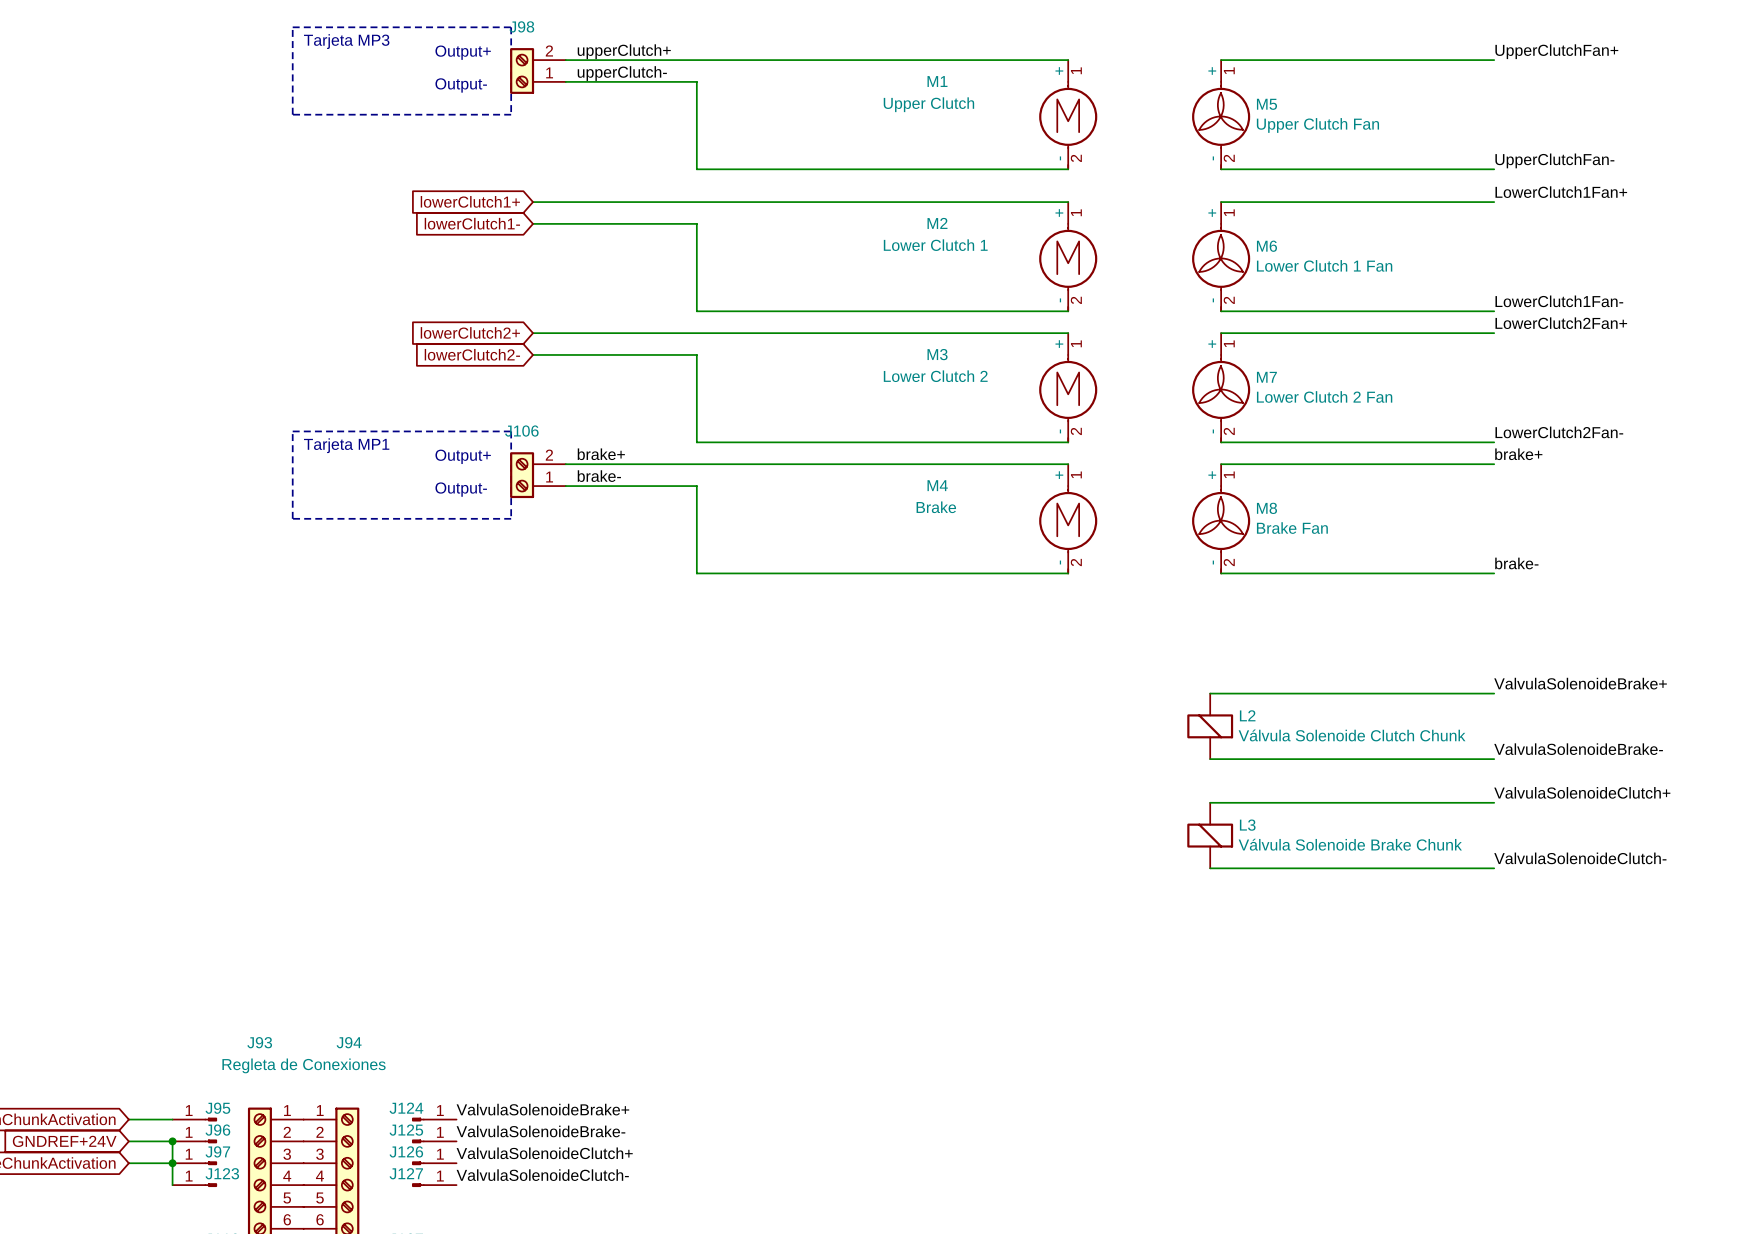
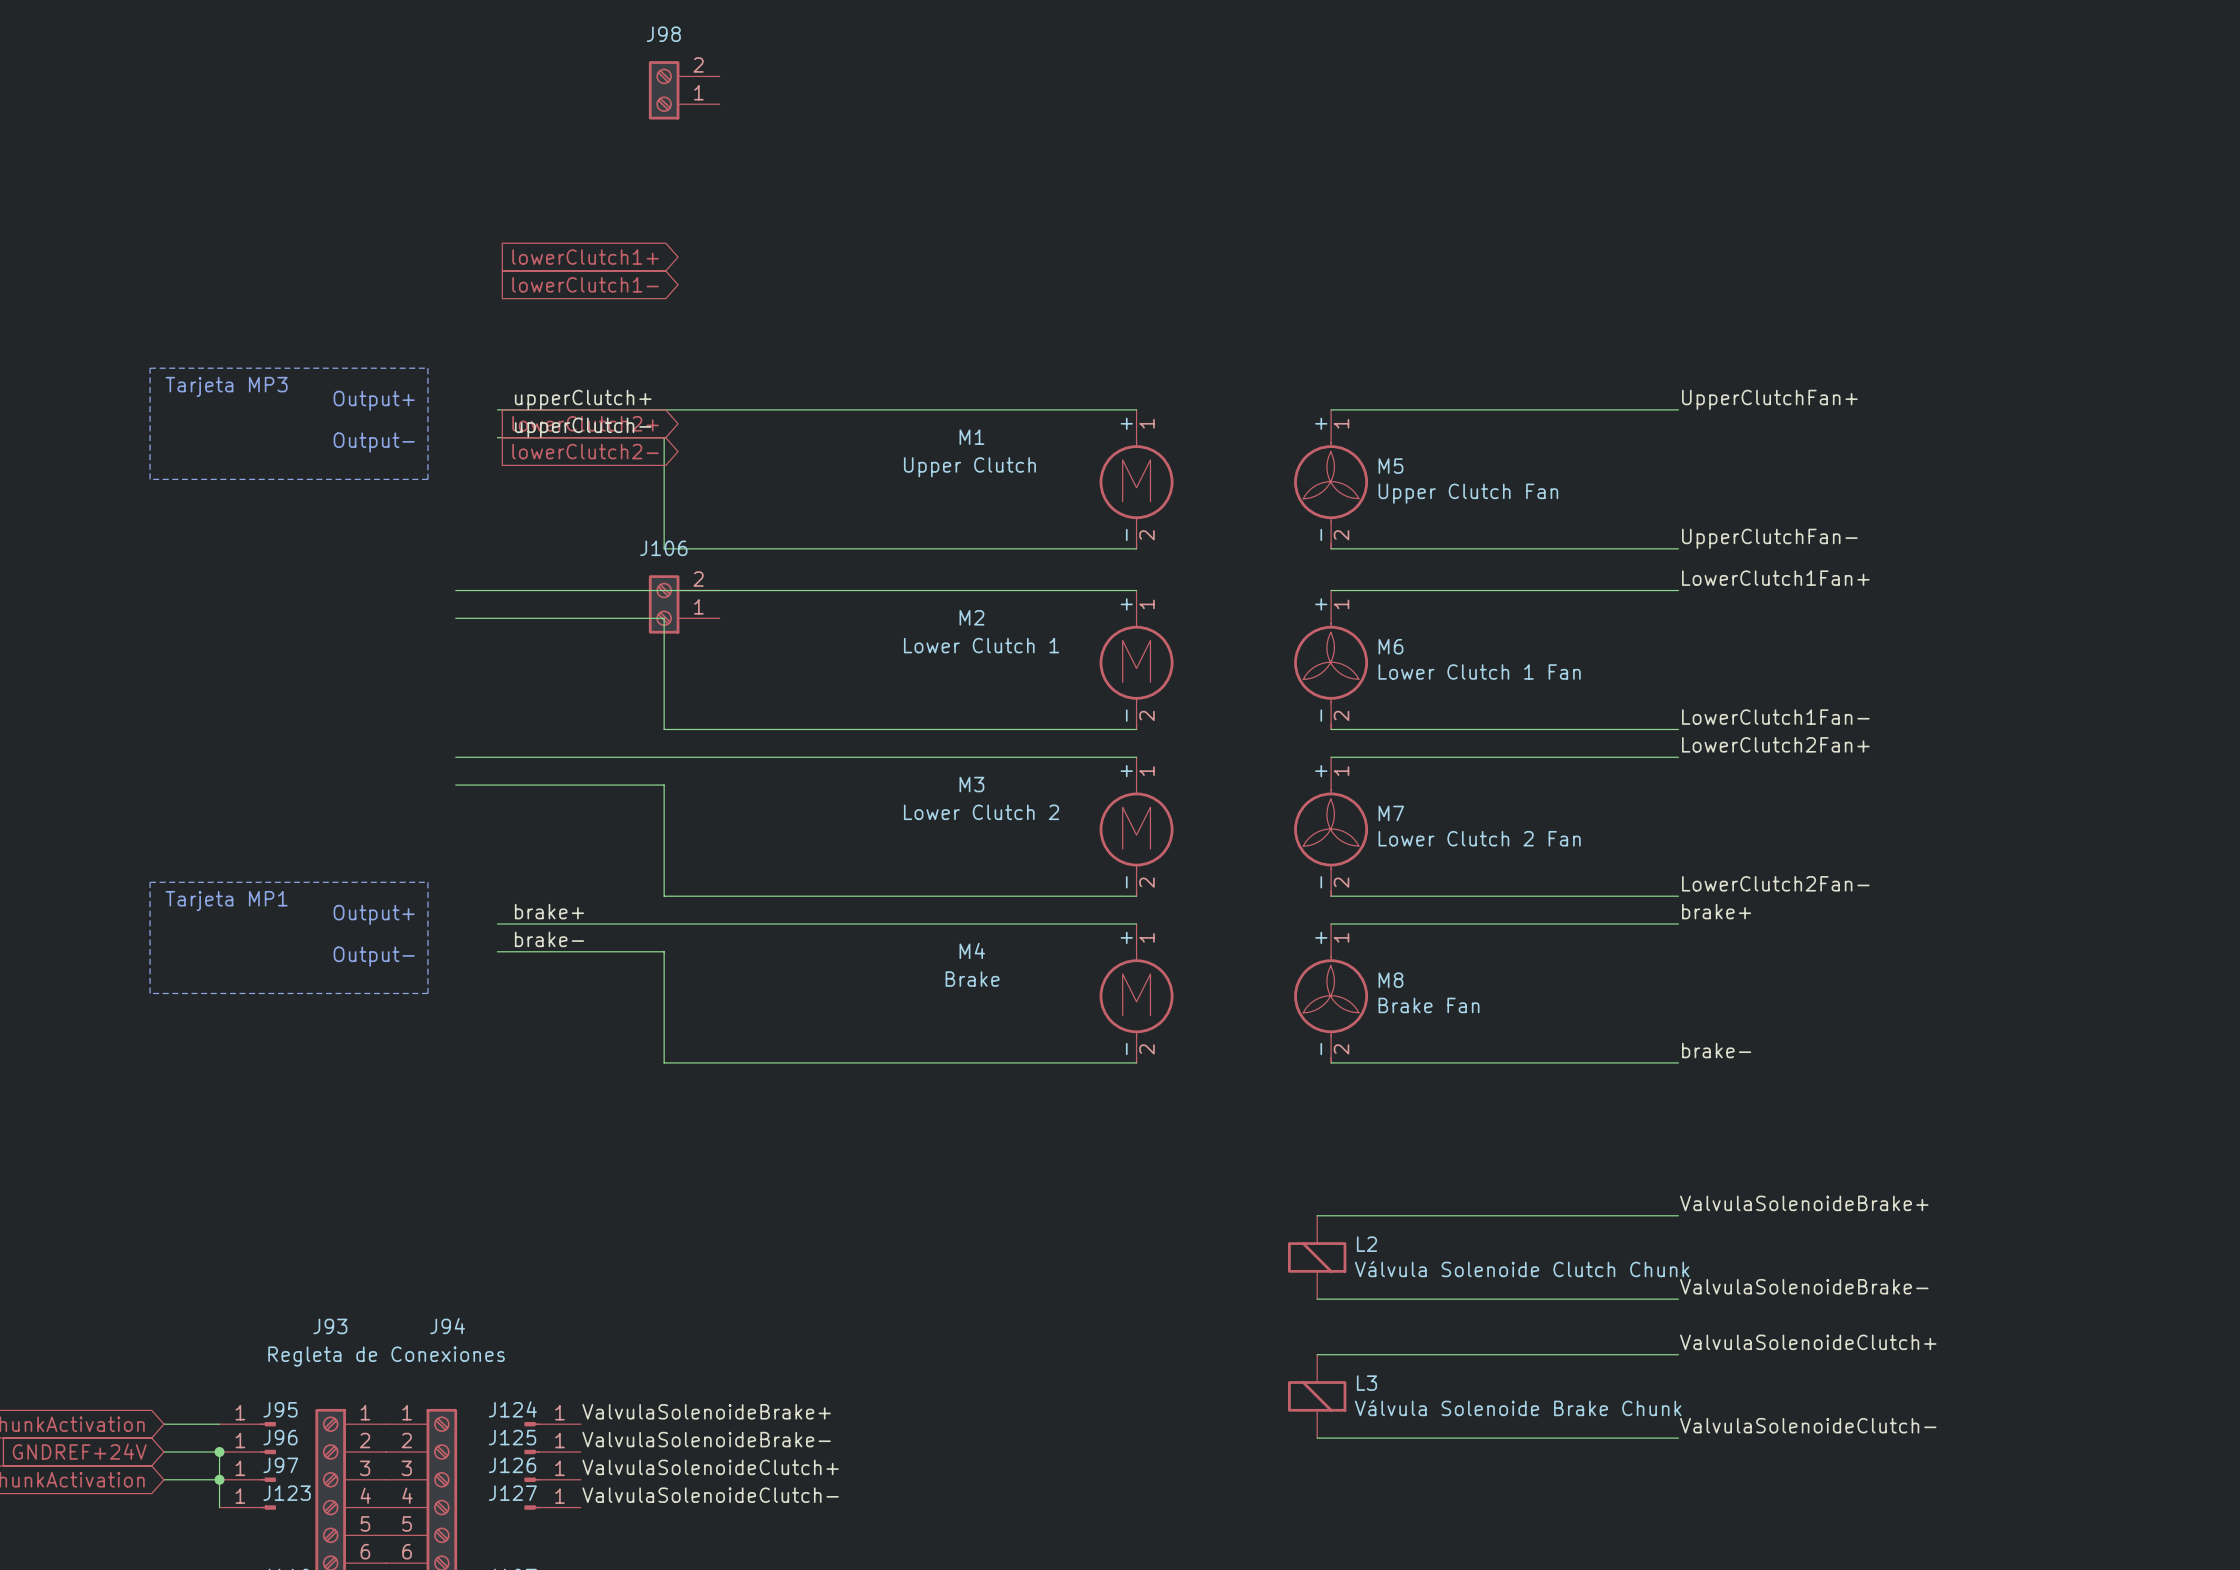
line: (292, 27) (511, 27) (511, 114) (292, 114) (292, 27) -> none
text: Tarjeta MP3 (346, 41) -> none
label: upperClutch+ (624, 51) -> none
label: UpperClutchFan+ (1556, 51) -> none
text: Output+ (463, 52) -> none
wire: (565, 60) (1068, 60) -> none
wire: (1221, 60) (1494, 60) -> none
label: upperClutch- (622, 73) -> none
wire: (565, 81) (696, 81) (696, 169) (1068, 169) -> none
text: Output- (461, 85) -> none
M1 position: (1068, 114) -> (1136, 479)
M5 position: (1221, 114) -> (1331, 479)
label: UpperClutchFan- (1554, 160) -> none
wire: (1221, 169) (1494, 169) -> none
label: LowerClutch1Fan+ (1561, 192) -> none
wire: (533, 202) (1068, 202) -> none
wire: (1221, 202) (1494, 202) -> none
wire: (533, 223) (696, 223) (696, 311) (1068, 311) -> none
M2 position: (1068, 256) -> (1136, 660)
M6 position: (1221, 256) -> (1331, 660)
line: none -> (150, 368) (427, 368) (427, 479) (150, 479) (150, 368)
label: LowerClutch1Fan- (1559, 301) -> none
text: none -> Tarjeta MP3 (226, 386)
wire: (1221, 311) (1494, 311) -> none
label: none -> upperClutch+ (583, 399)
label: none -> UpperClutchFan+ (1769, 399)
text: none -> Output+ (374, 400)
wire: none -> (497, 409) (1136, 409)
label: LowerClutch2Fan+ (1561, 323) -> none
wire: (533, 333) (1068, 333) -> none
wire: (1221, 333) (1494, 333) -> (1331, 409) (1678, 409)
label: none -> upperClutch- (583, 427)
wire: none -> (497, 437) (664, 437) (664, 548) (1136, 548)
text: none -> Output- (374, 442)
wire: (533, 354) (696, 354) (696, 442) (1068, 442) -> none
M3 position: (1068, 387) -> (1136, 826)
M7 position: (1221, 387) -> (1331, 826)
label: none -> UpperClutchFan- (1769, 538)
line: (292, 431) (292, 518) (511, 518) (511, 431) (292, 431) -> none
label: LowerClutch2Fan- (1559, 432) -> LowerClutch1Fan+ (1775, 578)
wire: (1221, 442) (1494, 442) -> (1331, 548) (1678, 548)
text: Tarjeta MP1 (346, 445) -> none
label: brake+ (601, 454) -> none
label: brake+ (1518, 454) -> none
text: Output+ (463, 456) -> none
wire: none -> (455, 590) (719, 590)
wire: (893, 464) (1046, 464) -> (1358, 590) (1553, 590)
wire: (1319, 464) (1494, 464) -> none
label: brake- (599, 476) -> none
wire: (565, 486) (696, 486) (696, 573) -> (455, 618) (664, 618) (664, 729) (886, 729)
text: Output- (461, 489) -> none
M4 position: (1068, 518) -> (1136, 993)
M8 position: (1221, 518) -> (1331, 993)
label: none -> LowerClutch1Fan- (1775, 717)
label: brake- (1516, 563) -> none
wire: (893, 573) (1046, 573) -> (1358, 729) (1553, 729)
wire: (1319, 573) (1494, 573) -> none
label: none -> LowerClutch2Fan+ (1775, 744)
wire: none -> (455, 757) (1136, 757)
wire: none -> (1331, 757) (1678, 757)
wire: none -> (455, 785) (664, 785) (664, 896) (1136, 896)
label: ValvulaSolenoideBrake+ (1580, 683) -> none
line: none -> (150, 882) (150, 993) (427, 993) (427, 882) (150, 882)
wire: (1210, 693) (1494, 693) -> none
label: none -> LowerClutch2Fan- (1775, 883)
wire: none -> (1331, 896) (1678, 896)
text: none -> Tarjeta MP1 (226, 901)
label: none -> brake+ (549, 911)
label: none -> brake+ (1716, 911)
text: none -> Output+ (374, 914)
wire: none -> (497, 923) (1136, 923)
wire: none -> (1331, 923) (1678, 923)
L2 position: (1210, 726) -> (1317, 1257)
label: none -> brake- (549, 939)
wire: none -> (497, 951) (664, 951) (664, 1062) (1136, 1062)
label: ValvulaSolenoideBrake- (1578, 749) -> none
text: none -> Output- (374, 956)
wire: (1210, 759) (1494, 759) -> none
label: ValvulaSolenoideClutch+ (1582, 792) -> none
wire: (1210, 802) (1494, 802) -> none
label: none -> brake- (1716, 1050)
wire: none -> (1331, 1062) (1678, 1062)
L3 position: (1210, 835) -> (1317, 1396)
label: ValvulaSolenoideClutch- (1580, 858) -> none
wire: (1210, 868) (1494, 868) -> (1317, 1215) (1678, 1215)
label: none -> ValvulaSolenoideBrake+ (1804, 1203)
label: none -> ValvulaSolenoideBrake- (1804, 1286)
wire: none -> (1317, 1299) (1678, 1299)
label: none -> ValvulaSolenoideClutch+ (1808, 1342)
wire: none -> (1317, 1354) (1678, 1354)
label: none -> ValvulaSolenoideClutch- (1808, 1425)
wire: none -> (1317, 1438) (1678, 1438)

